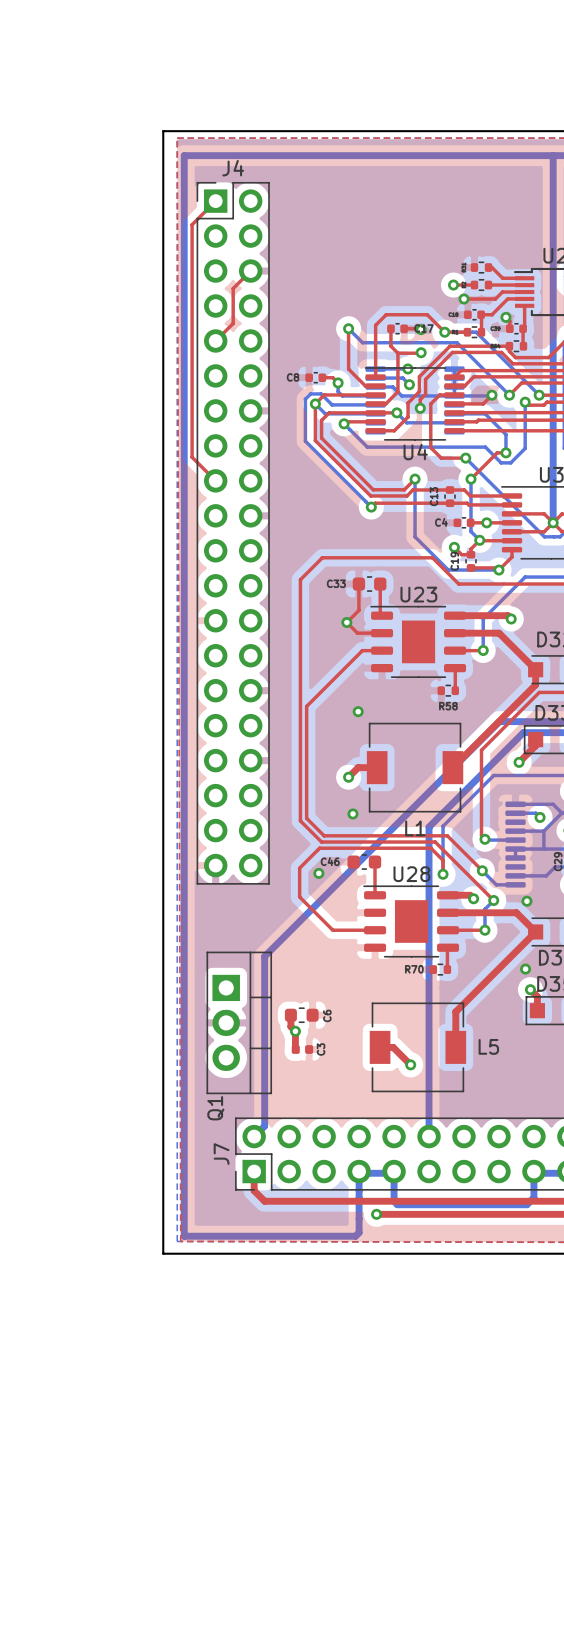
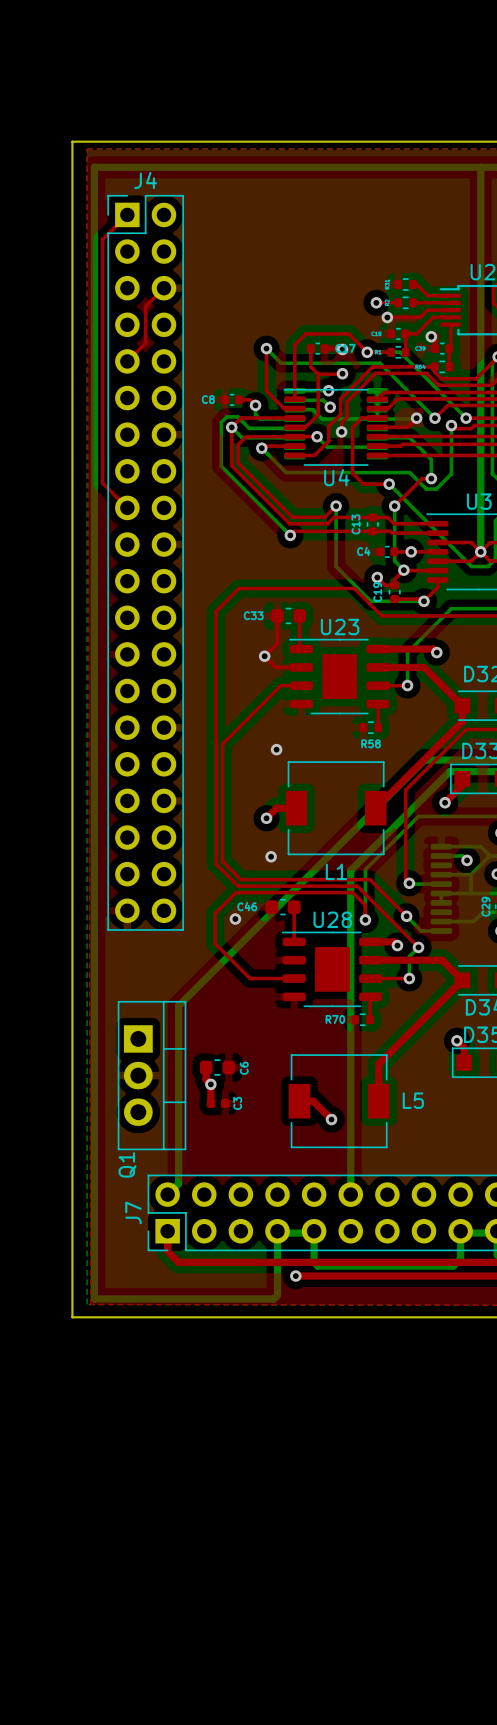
via: (526, 901) -> none
via: (525, 969) -> none

